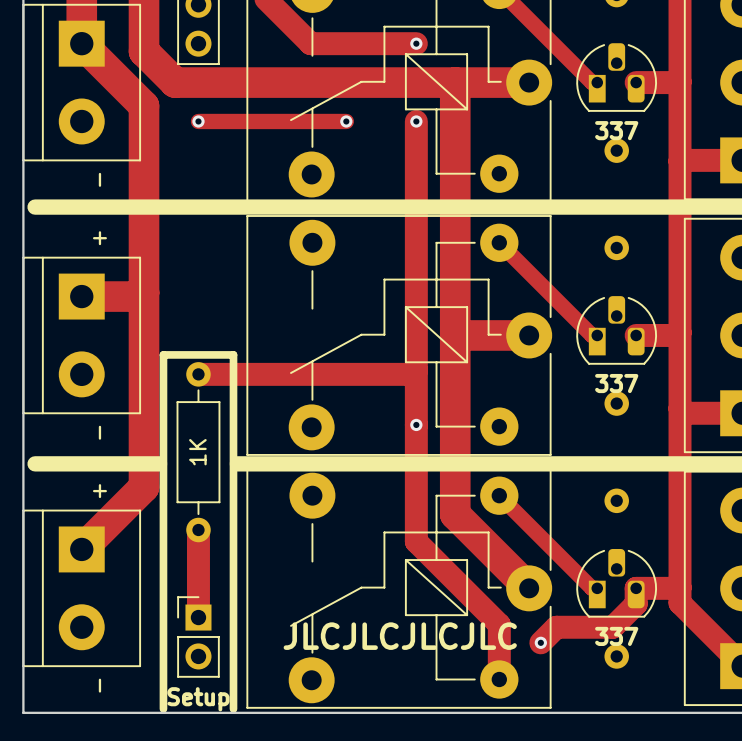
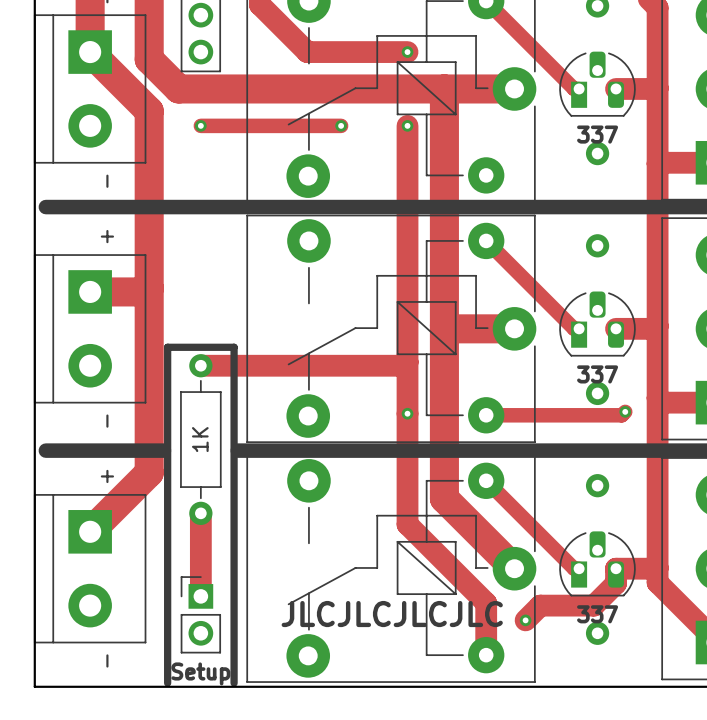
track: none -> (625, 411) (621, 415) (486, 415)
via: none -> (625, 411)

